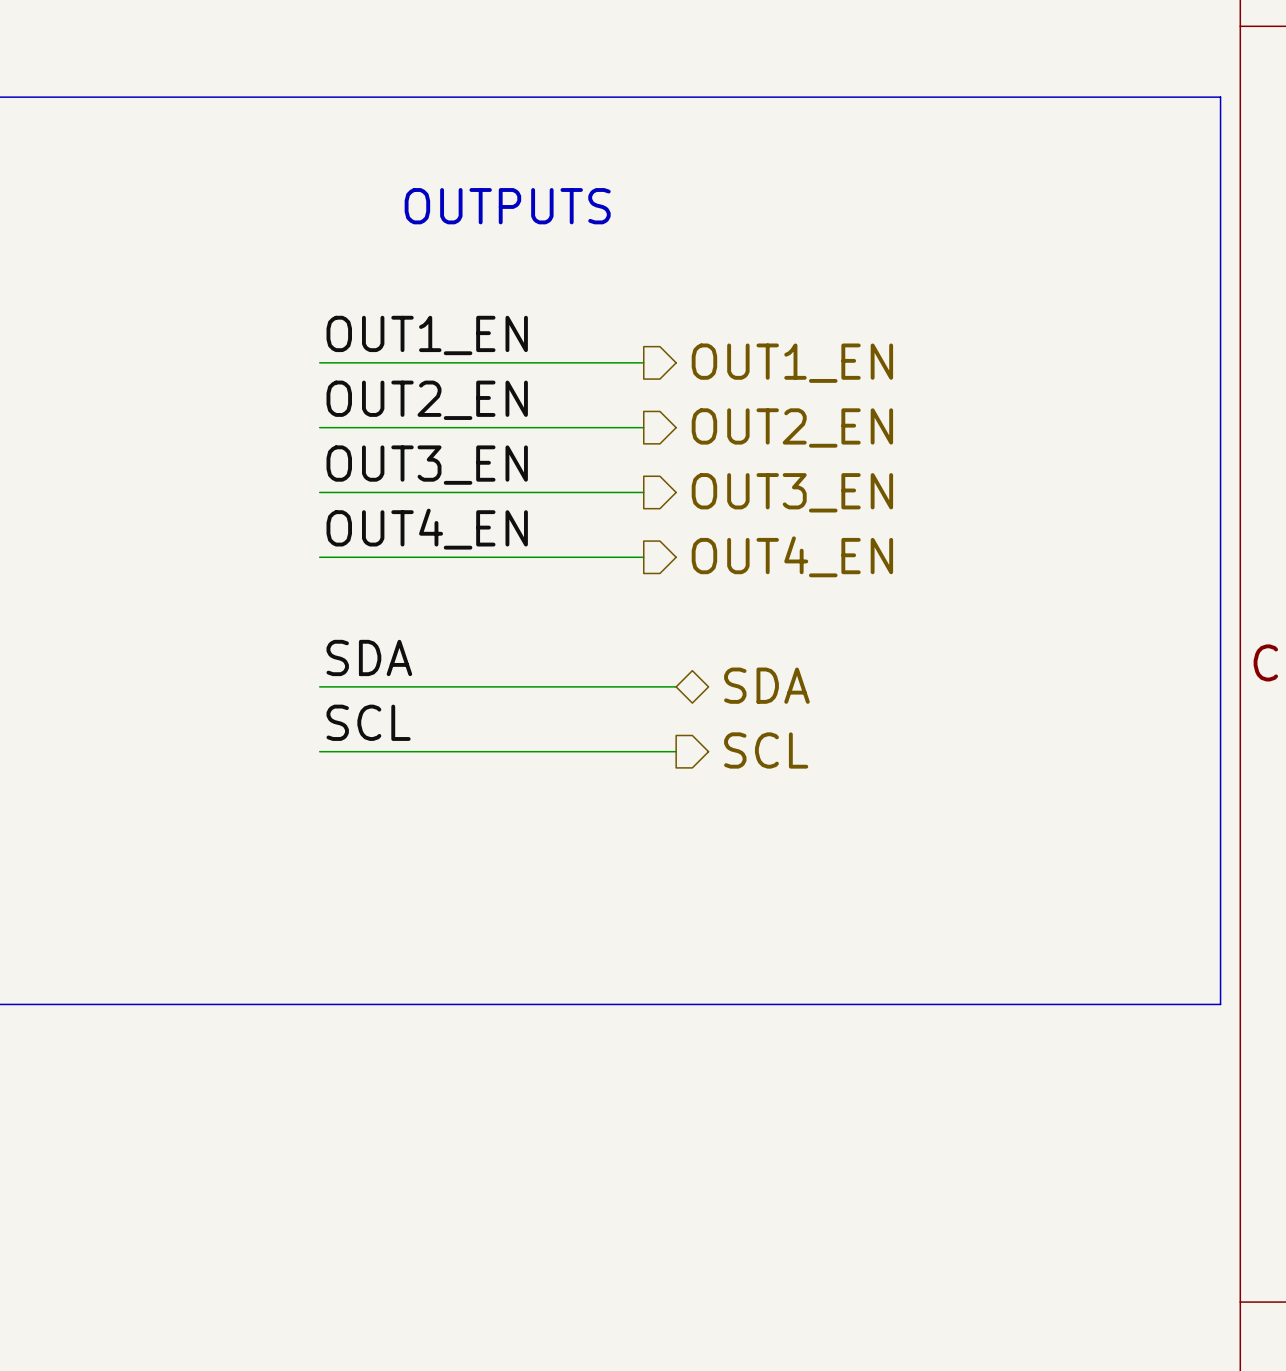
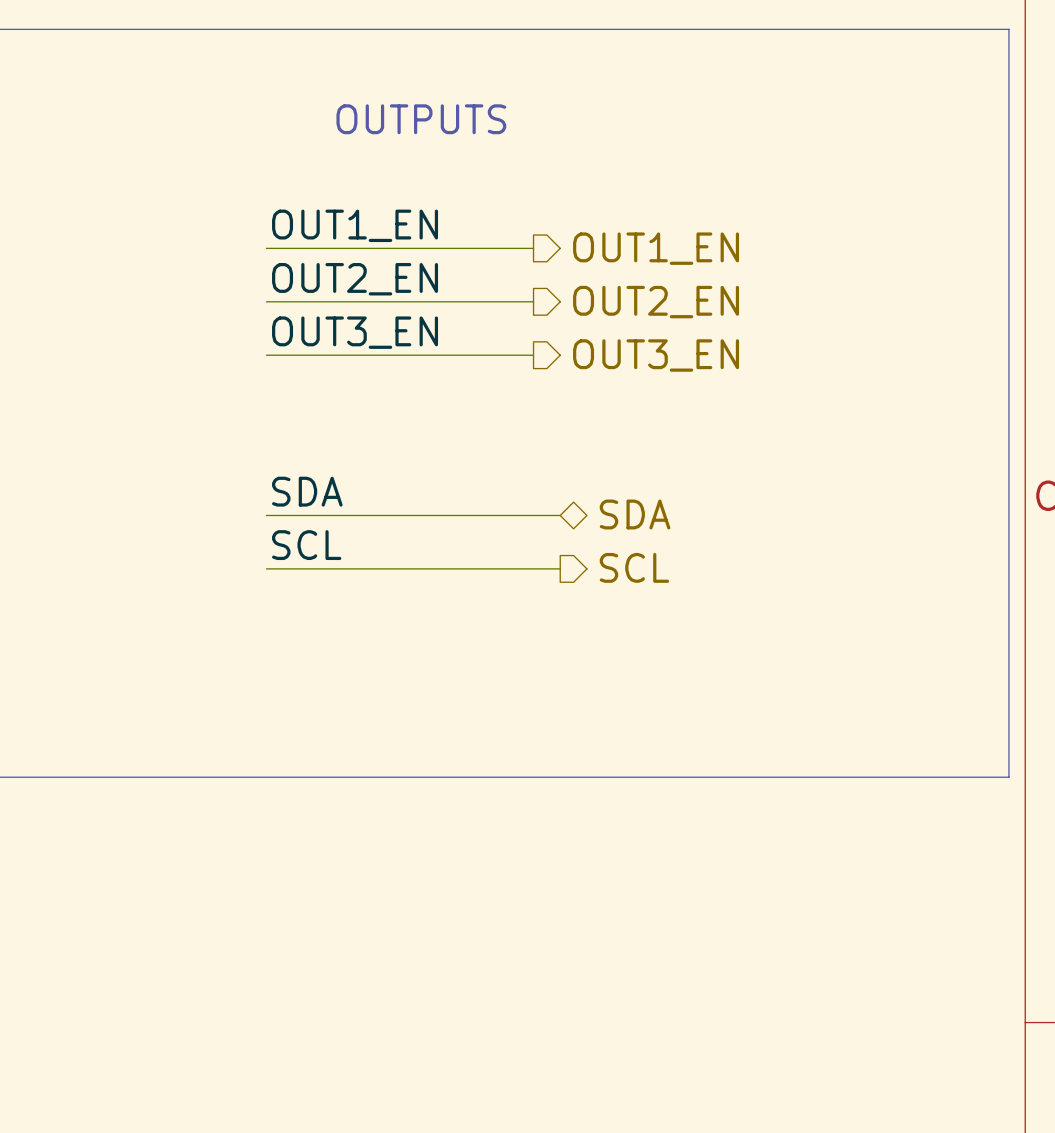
label: OUT4_EN (427, 529) -> none
hierarchical label: OUT4_EN (792, 556) -> none
wire: (319, 557) (643, 557) -> none

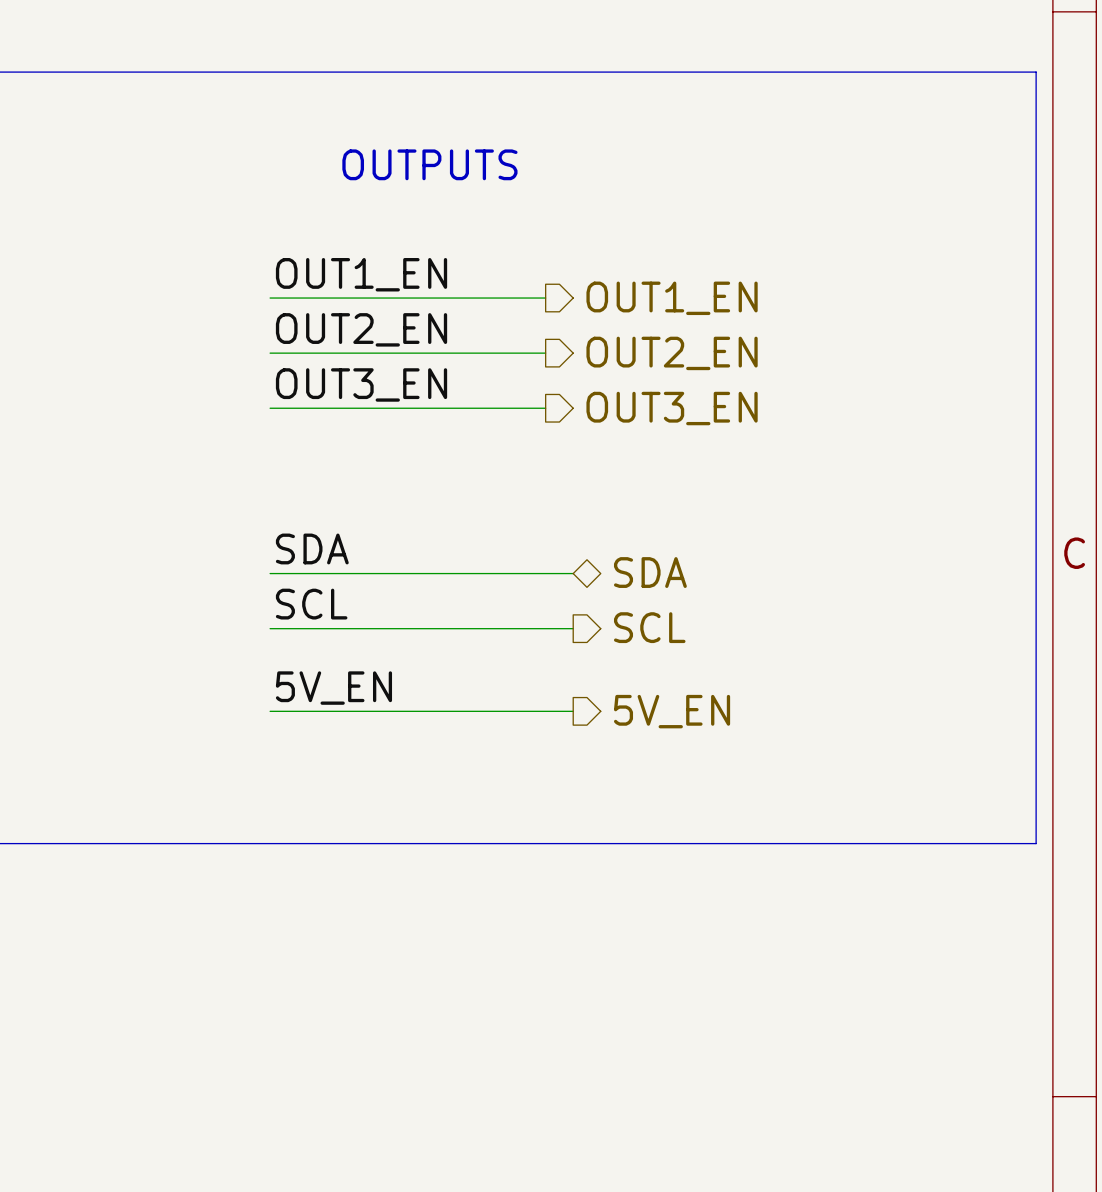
label: none -> 5V_EN (333, 688)
wire: none -> (270, 711) (573, 711)
hierarchical label: none -> 5V_EN (672, 711)

